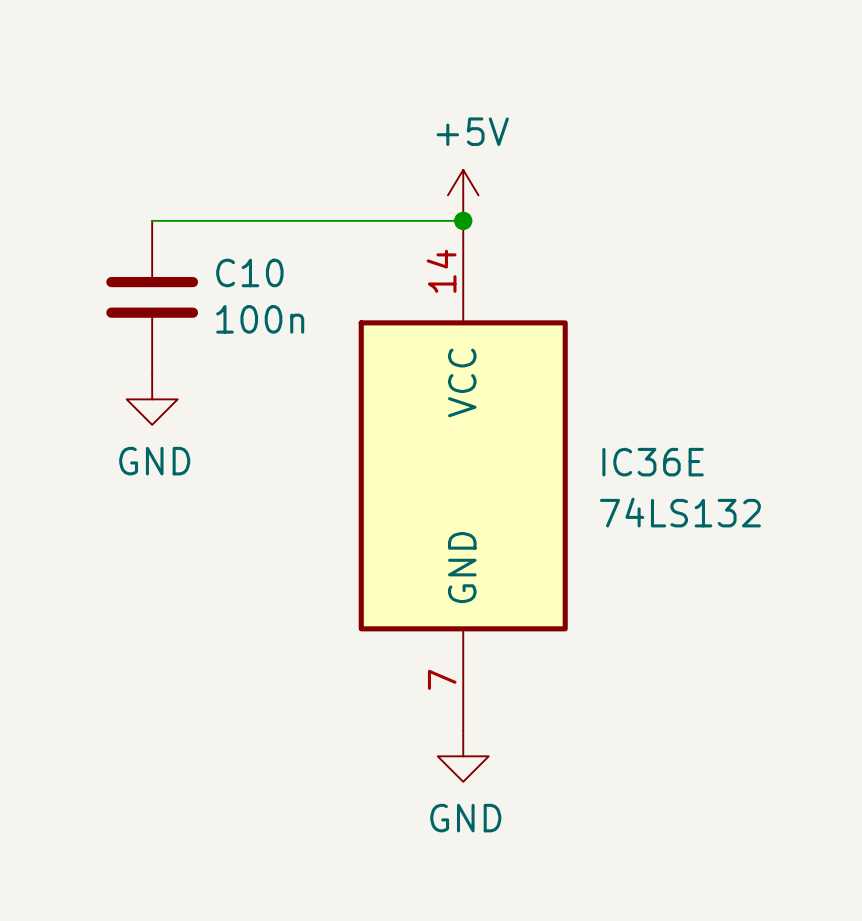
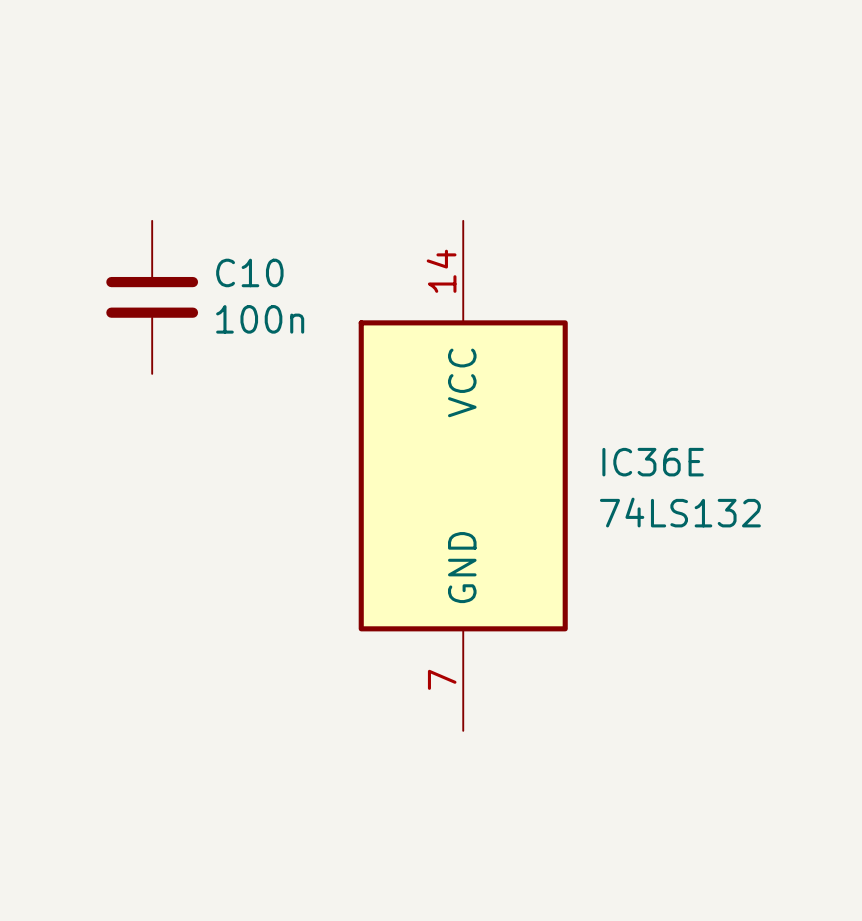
power symbol: +5V (463, 195) -> none
wire: (152, 220) (463, 220) -> none
junction: (463, 220) -> none
power symbol: GND (152, 399) -> none
power symbol: GND (463, 756) -> none

